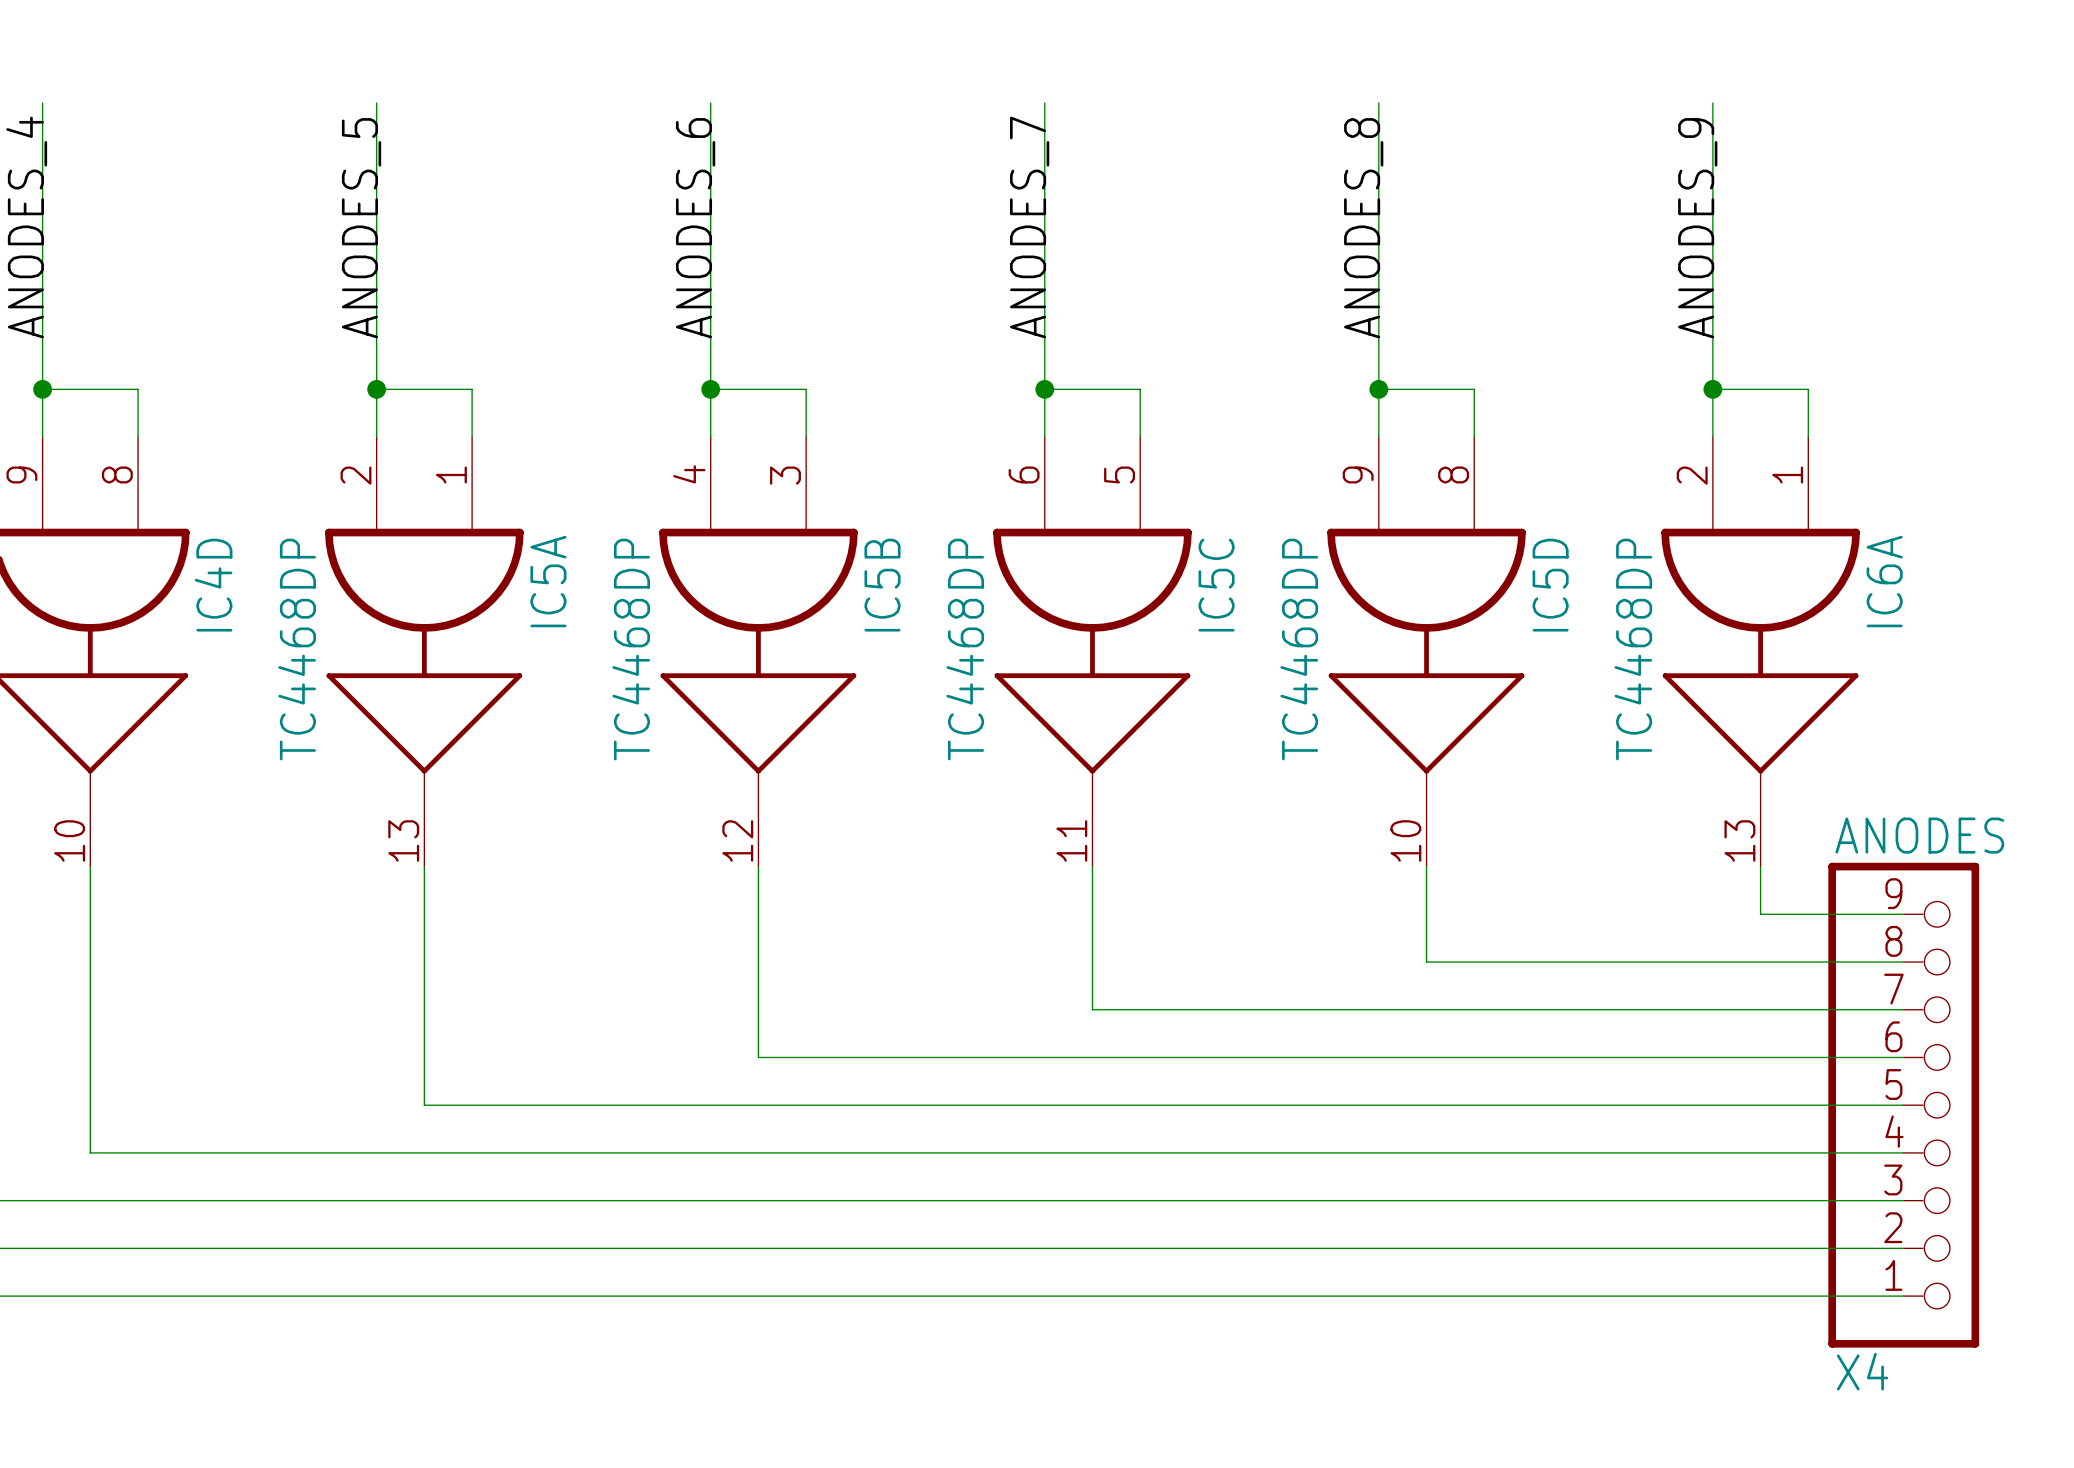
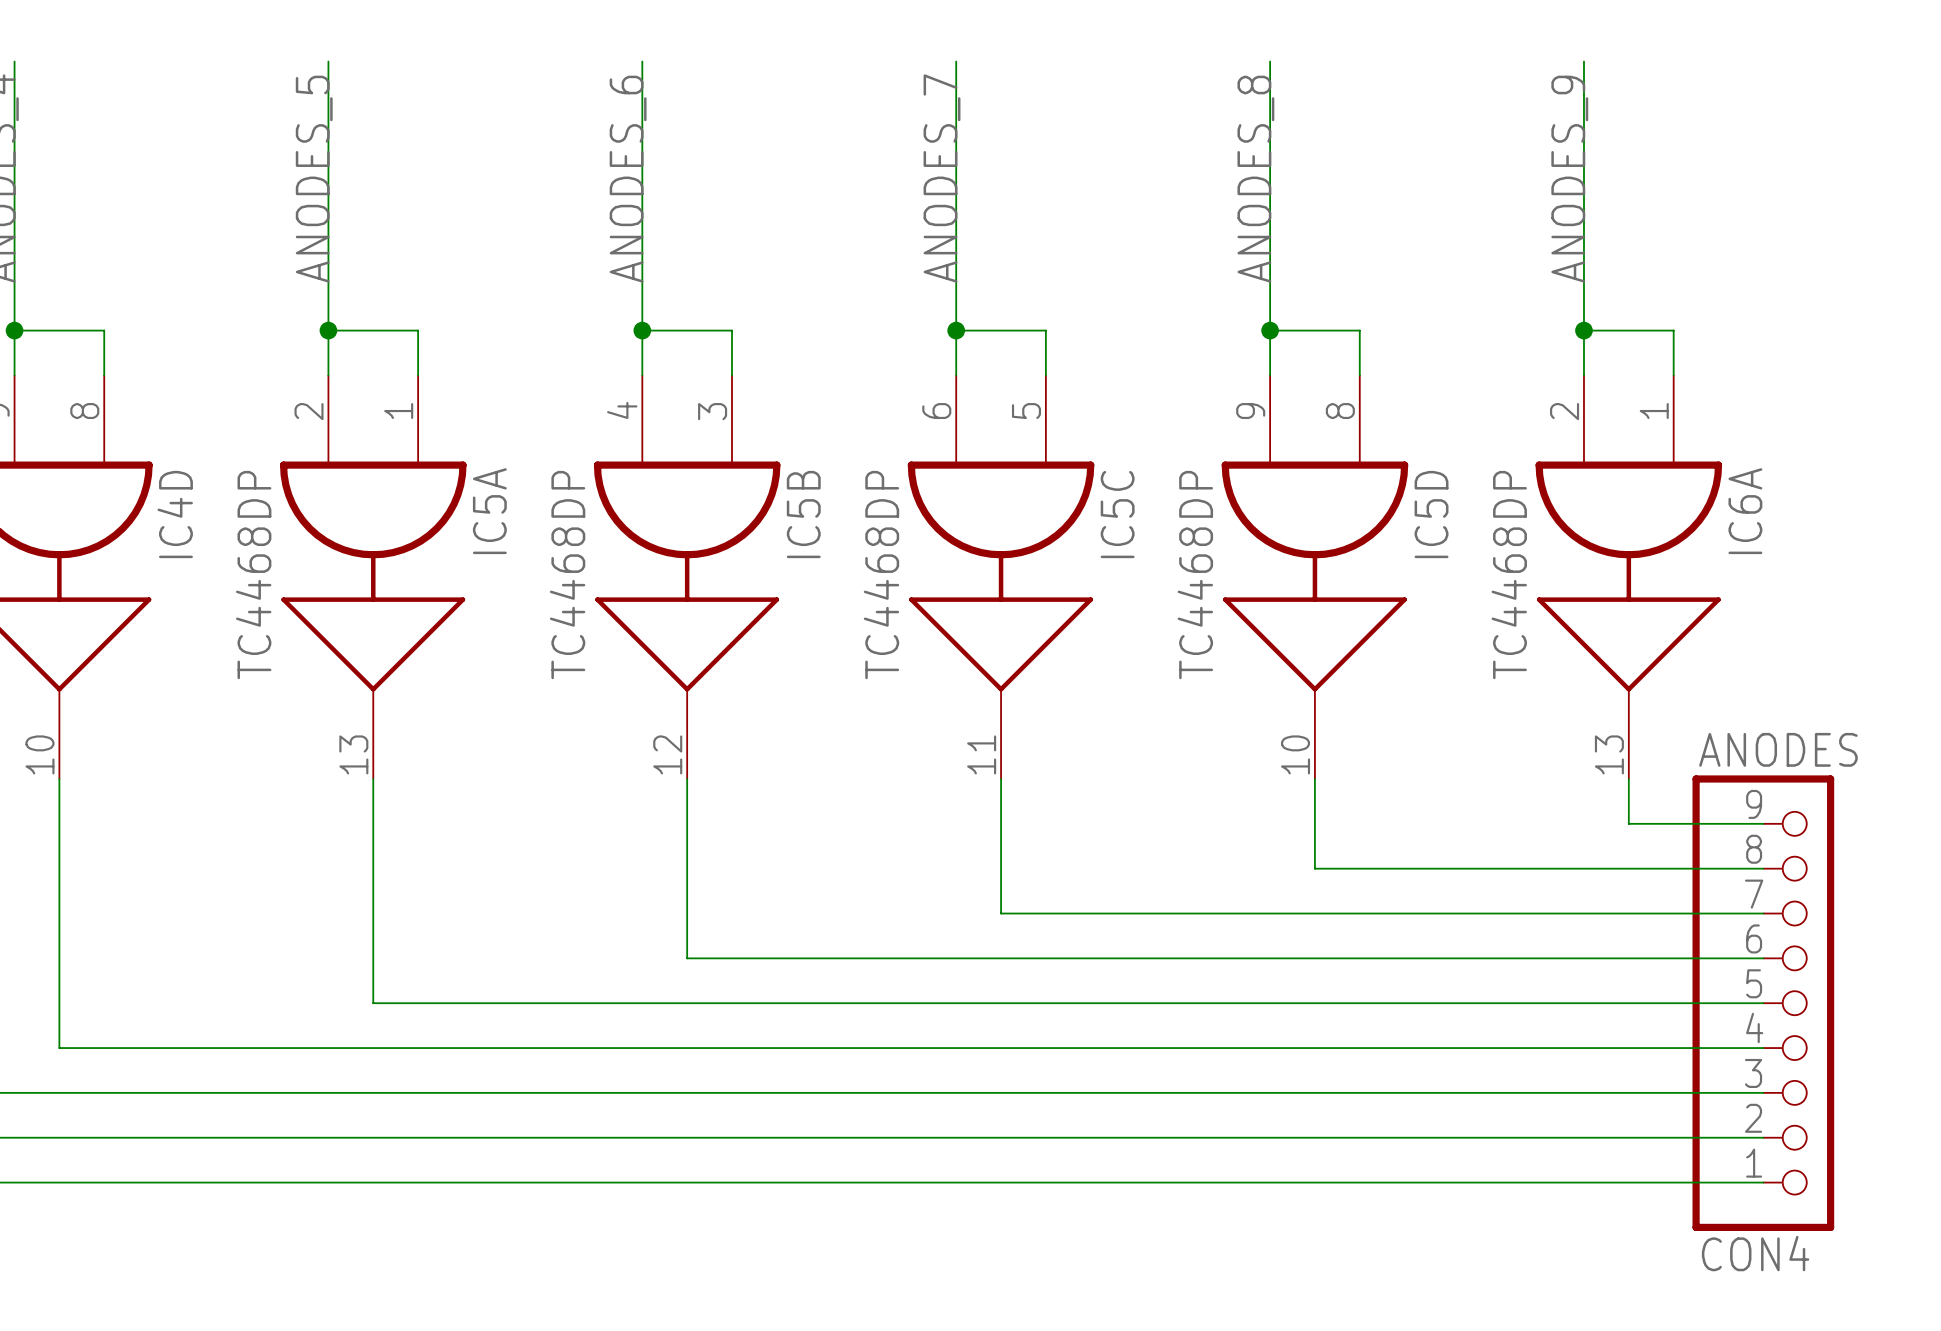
X4 name: X4 (1862, 1371) -> CON4 (1755, 1253)

